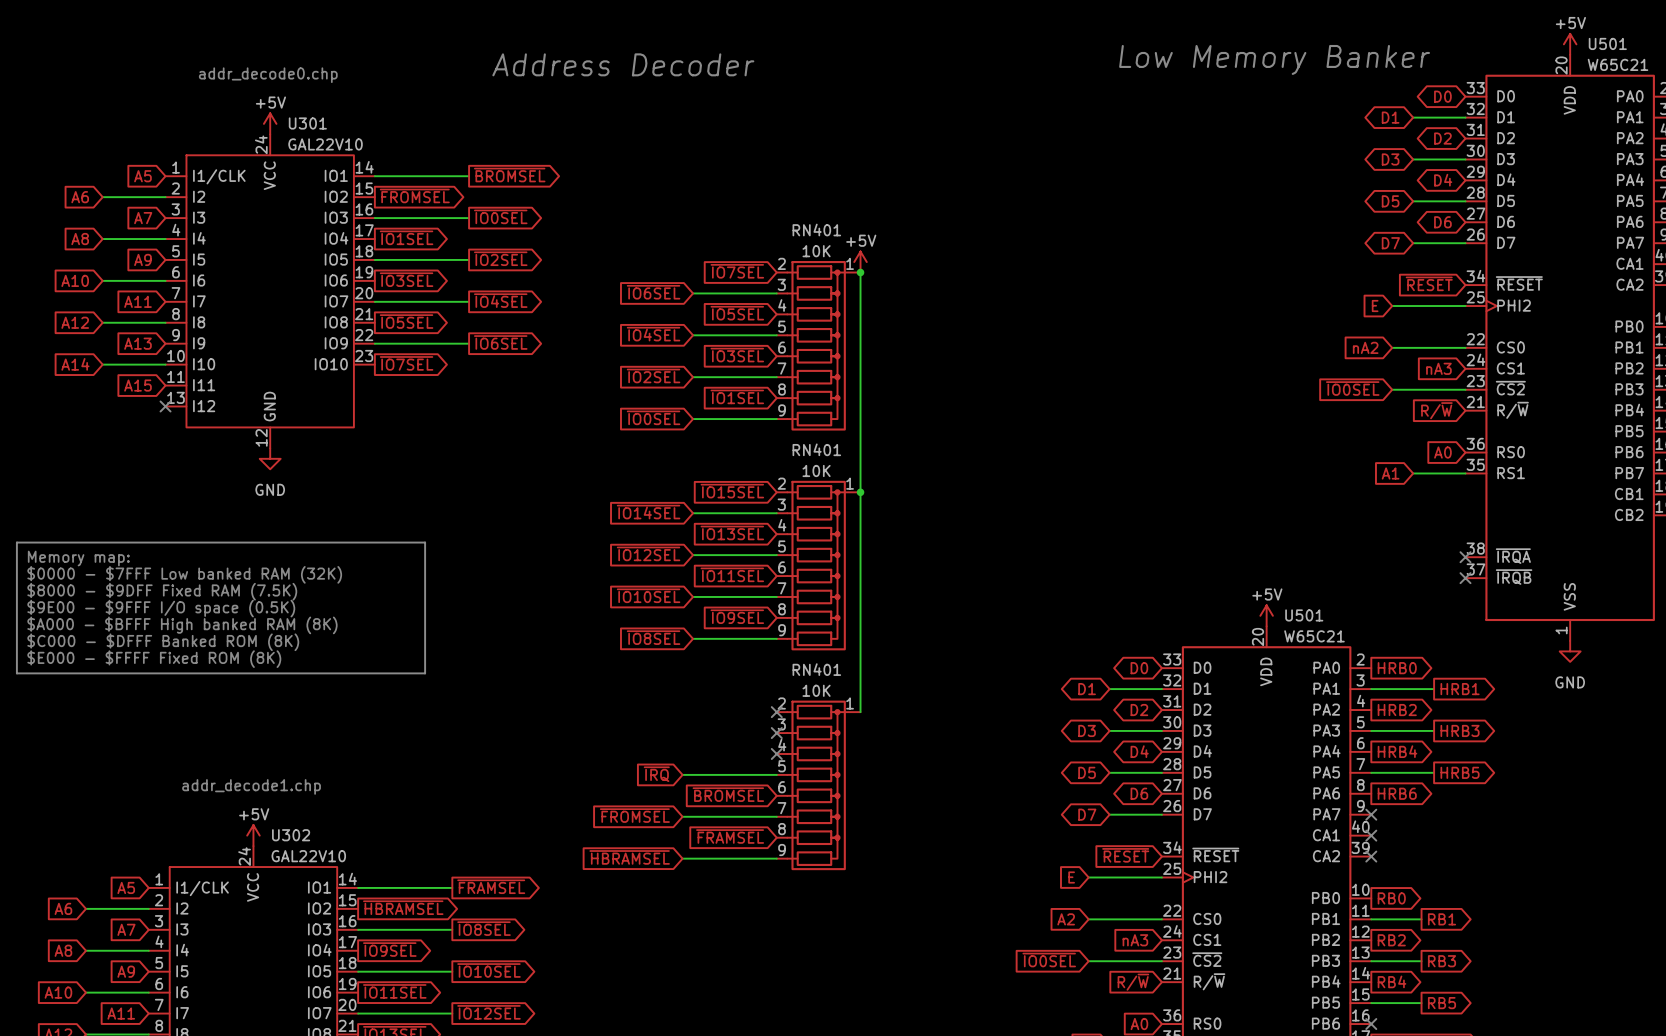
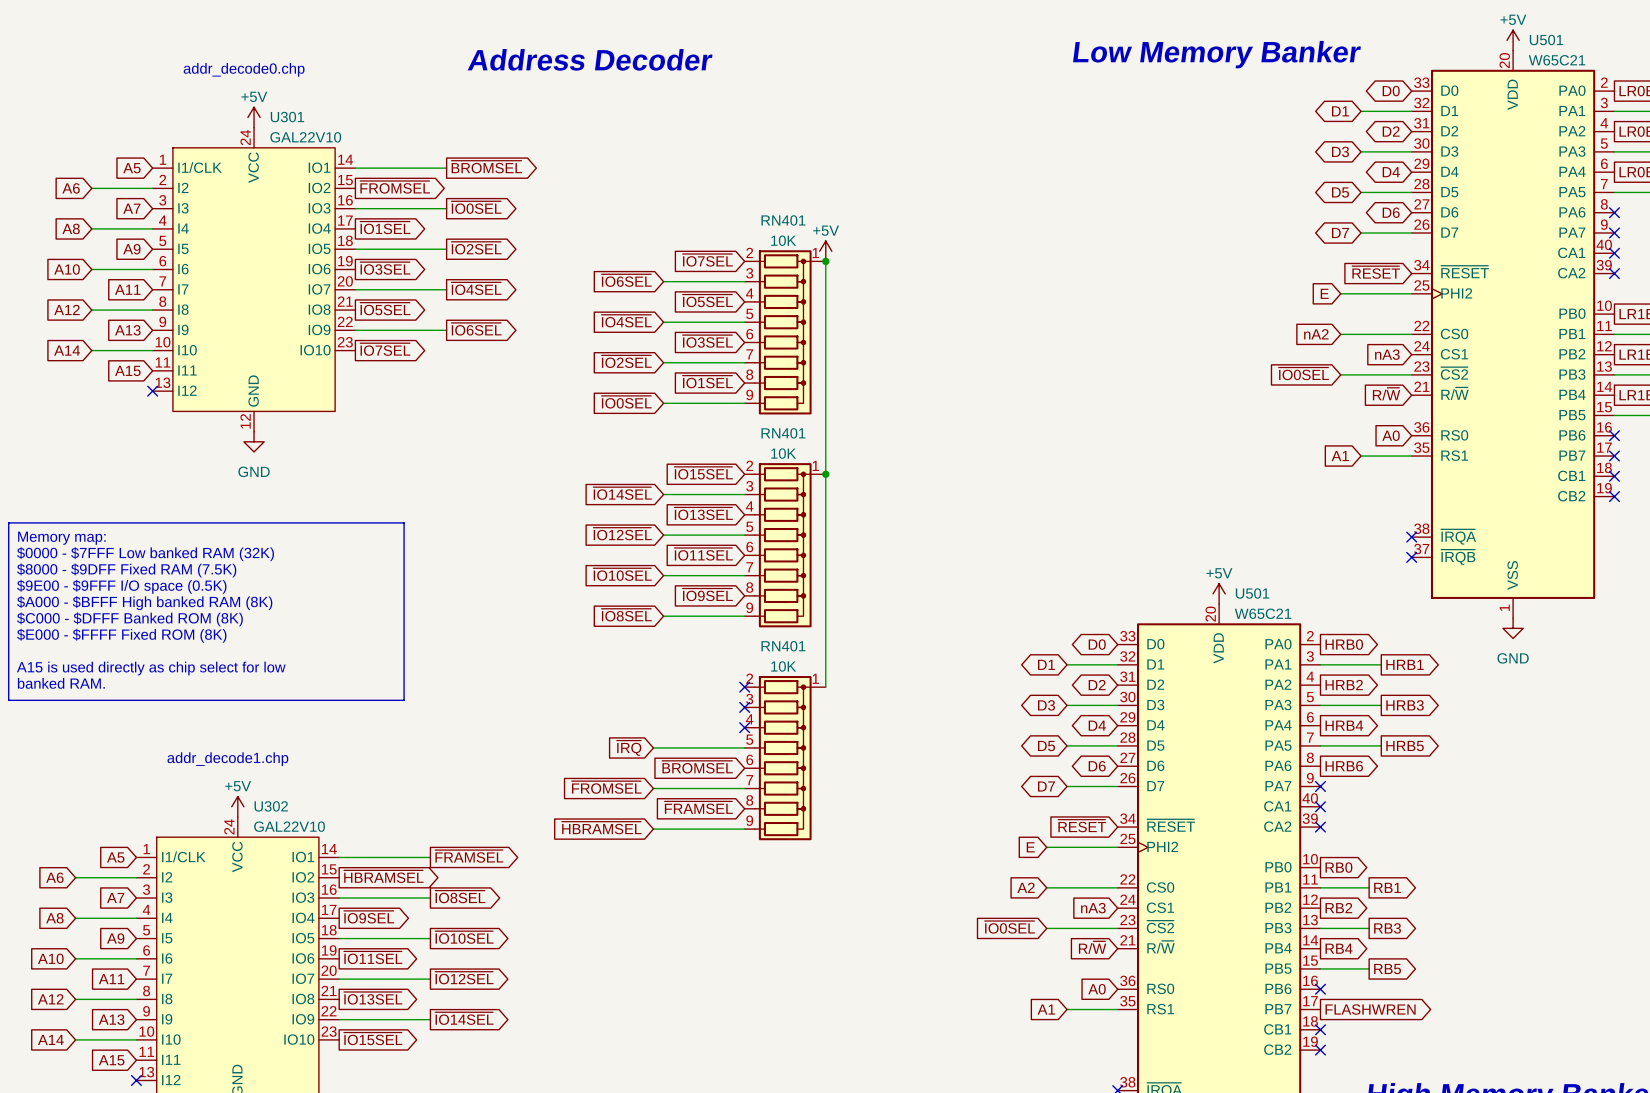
line: (16, 673) (425, 673) -> (8, 649) (8, 700) (404, 700) (404, 649)
text: none -> A15 is used directly as chip select for low (151, 668)
text: none -> banked RAM. (61, 683)

